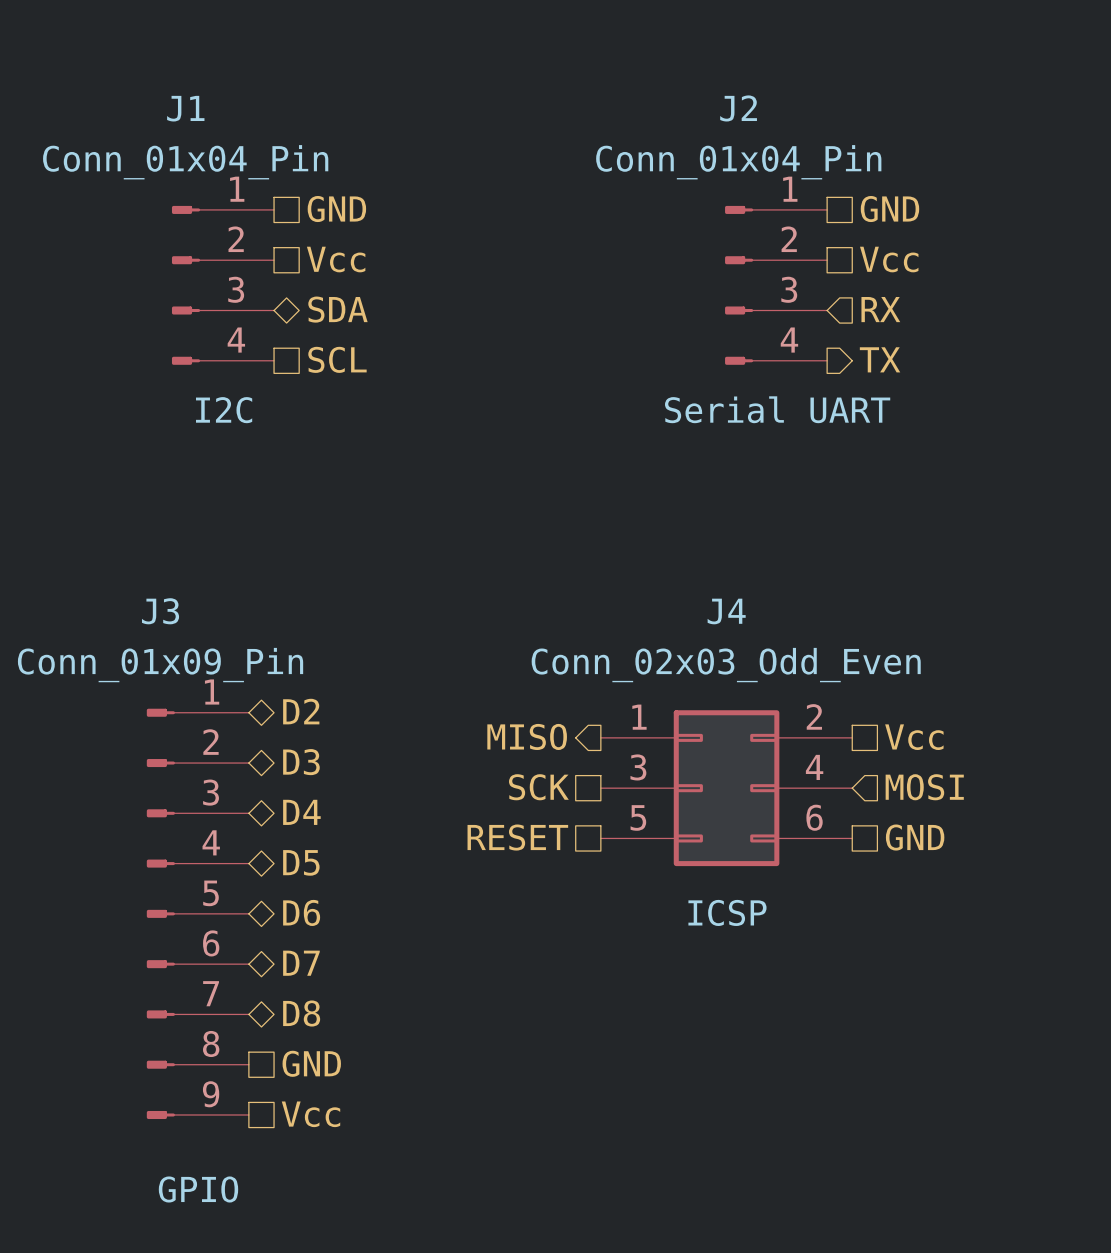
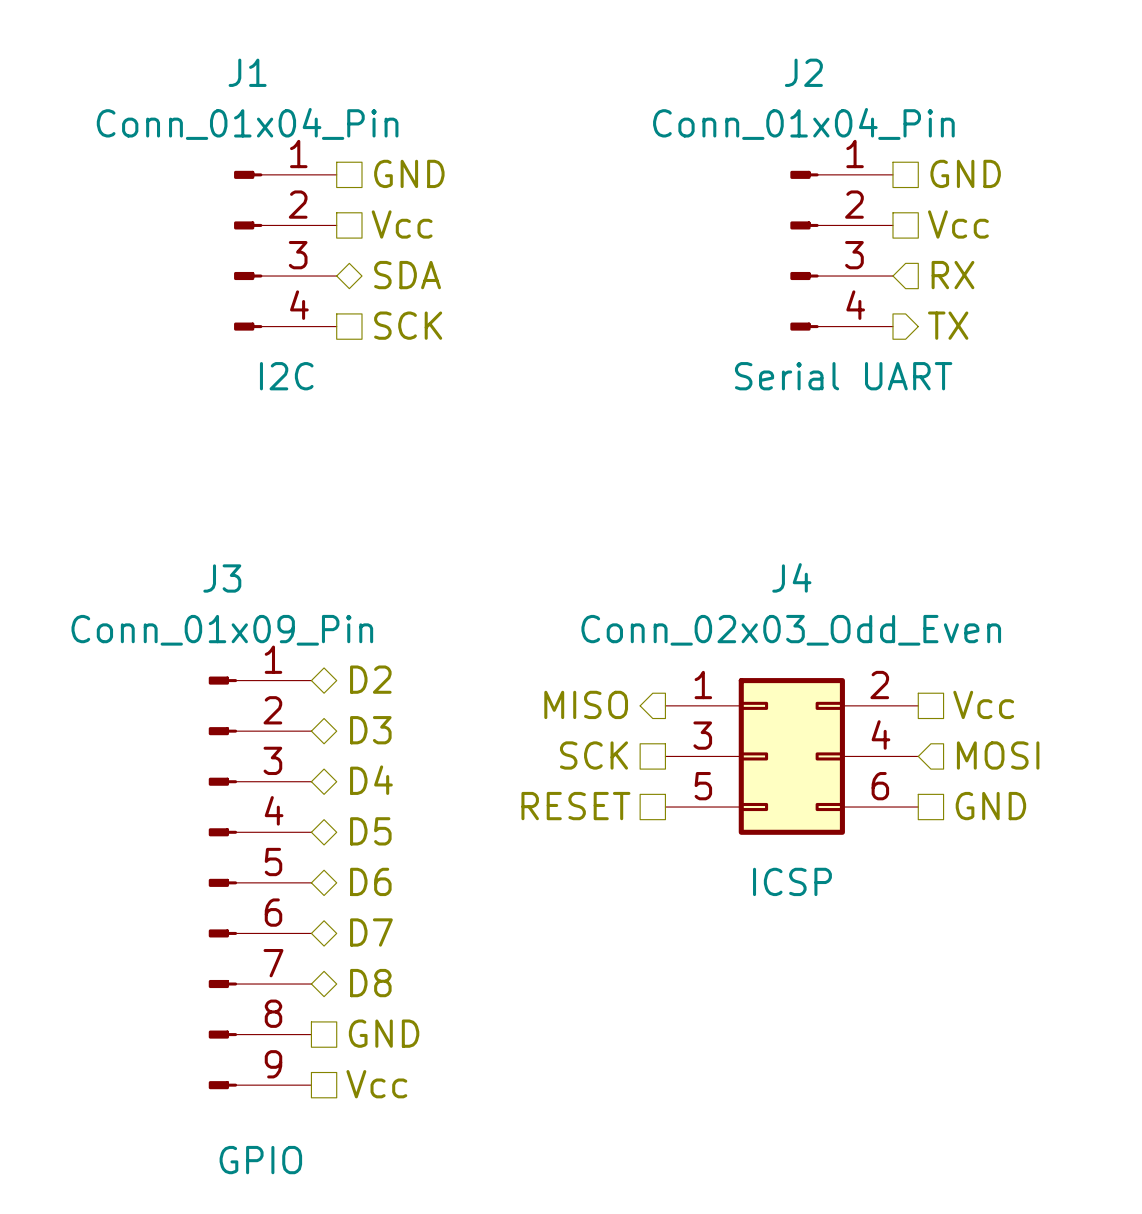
hierarchical label: SCL (337, 359) -> SCK (408, 325)

